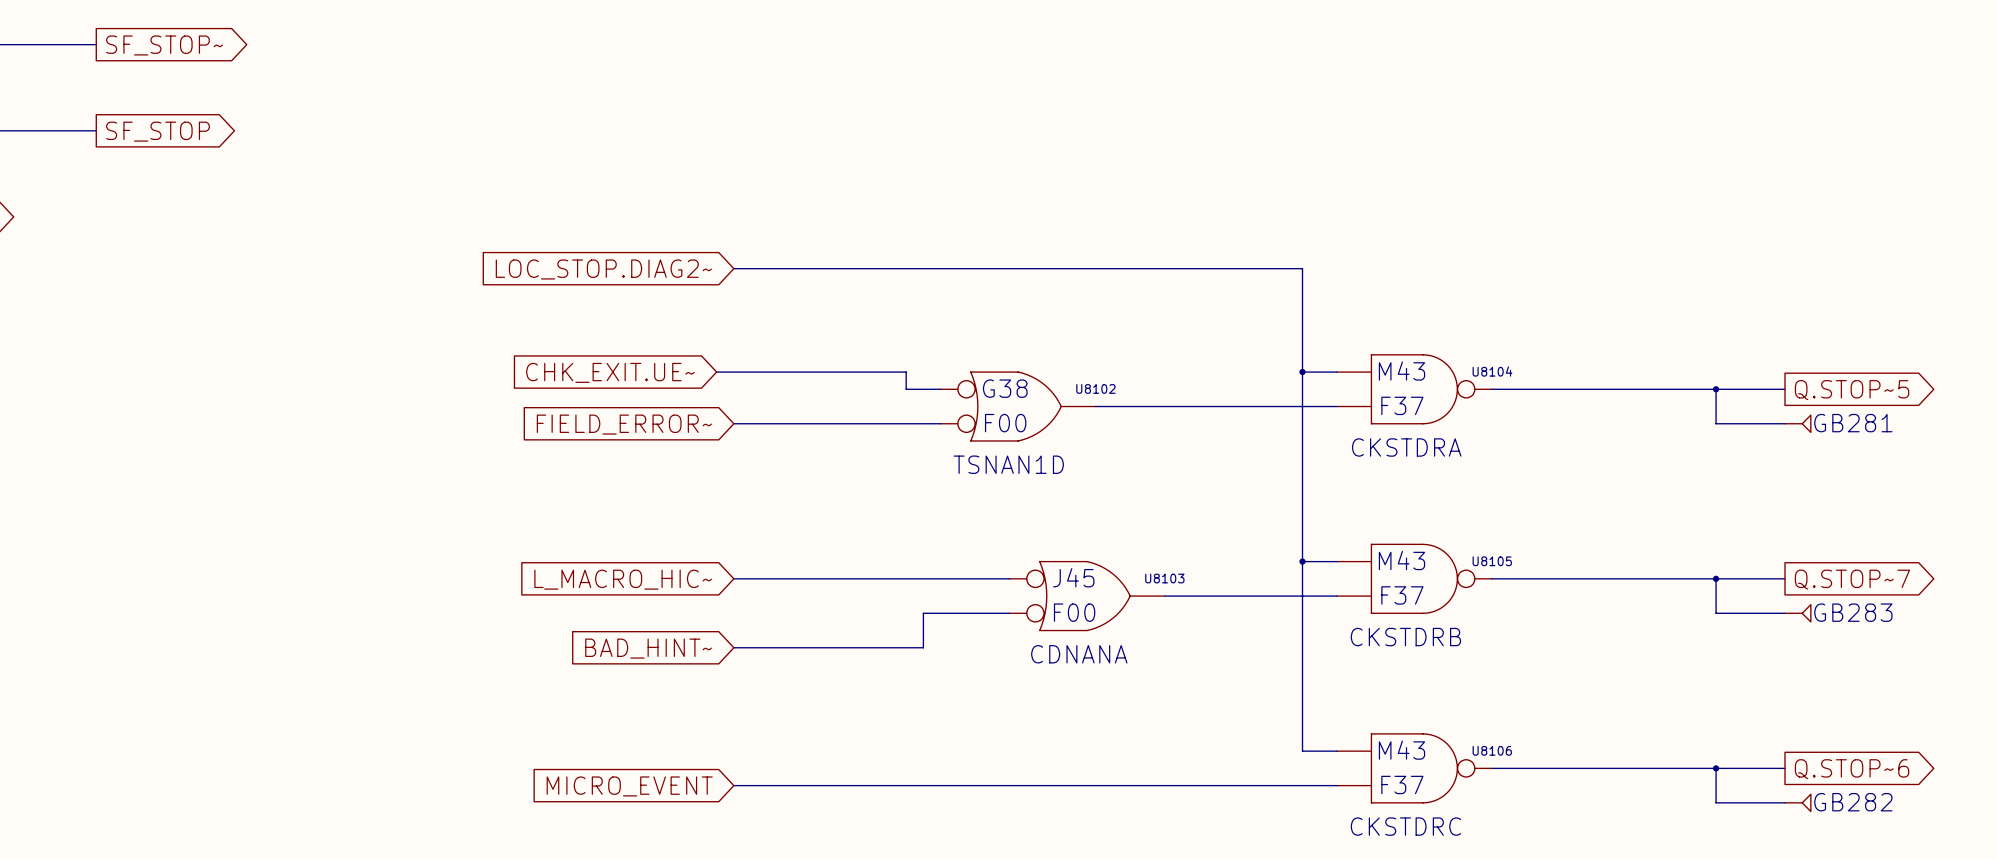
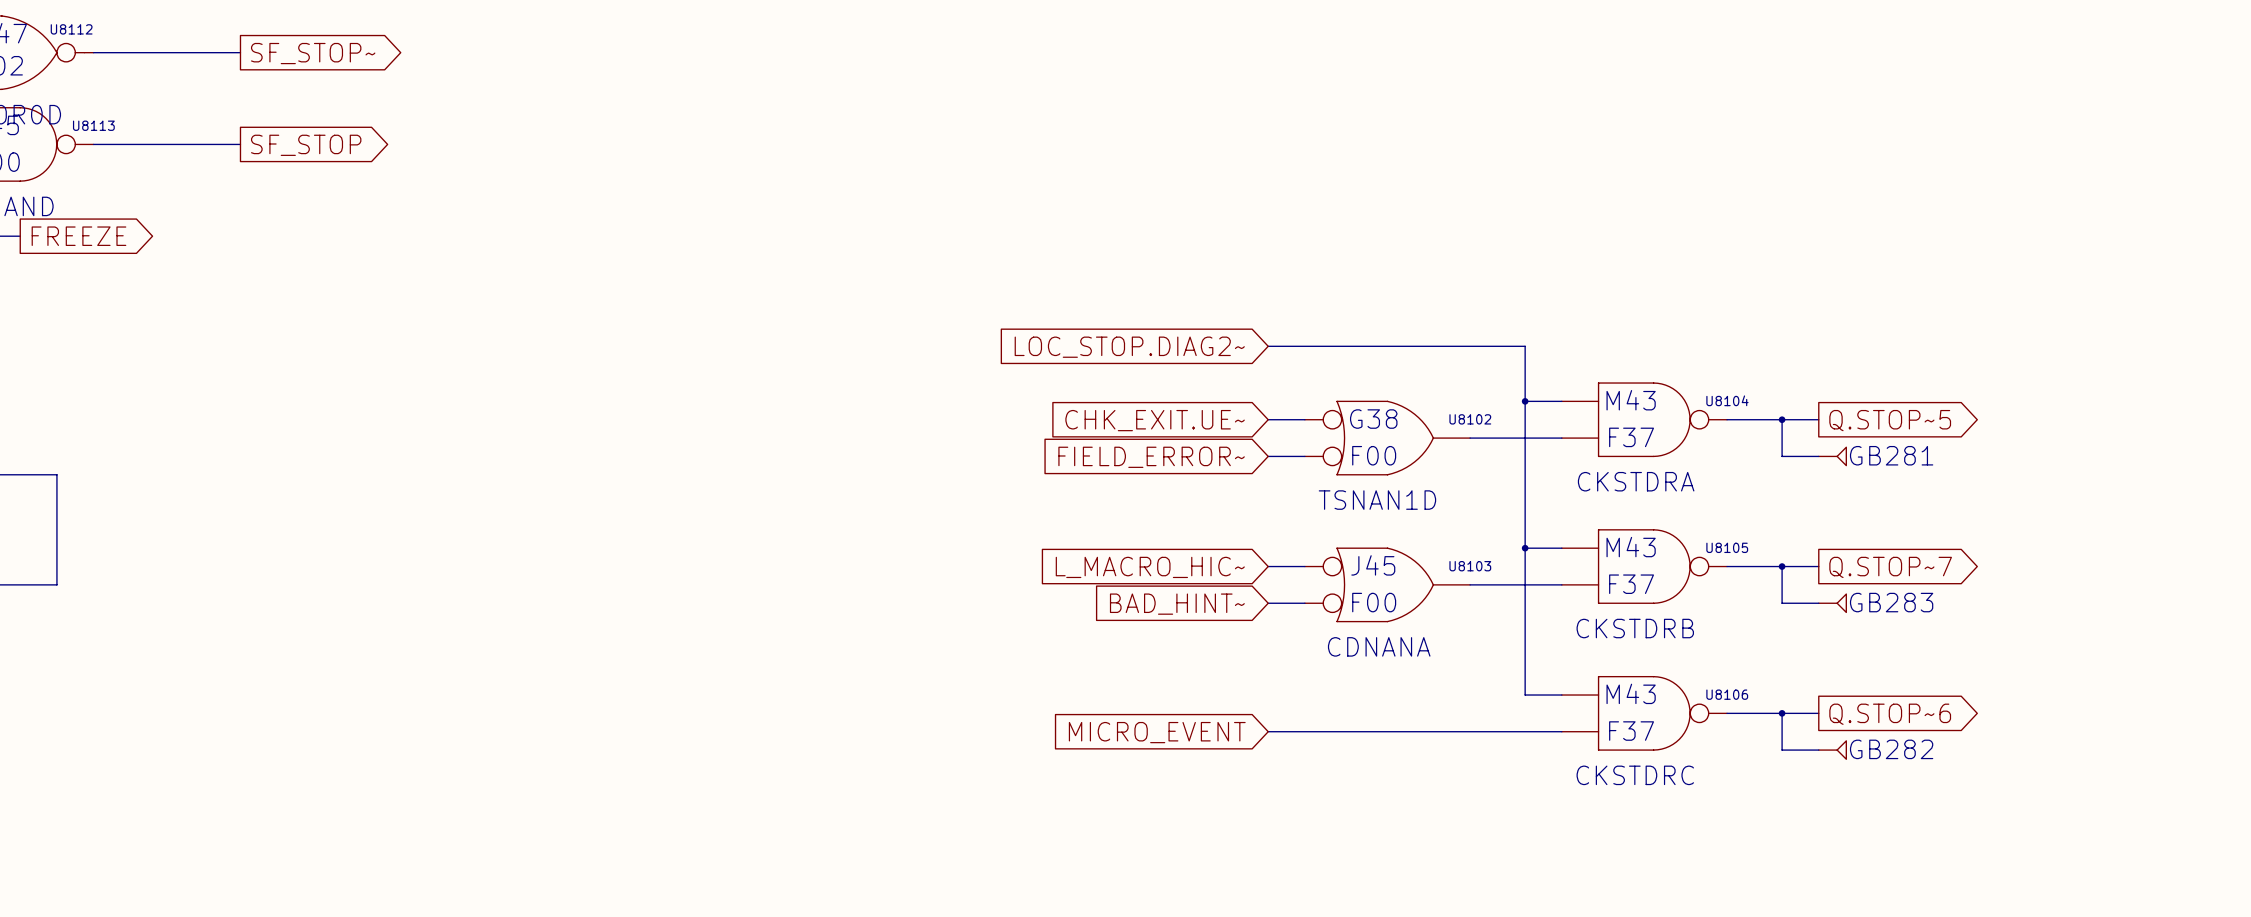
wire: (733, 268) (1302, 268) (1302, 320) -> (1268, 346) (1525, 346)
global label: LOC_STOP.DIAG2~ (603, 269) -> none
global label: none -> LOC_STOP.DIAG2~ (1129, 347)
global label: CHK_EXIT.UE~ (610, 372) -> none
wire: (716, 372) (906, 372) (906, 389) (940, 389) -> none
wire: none -> (1268, 419) (1304, 419)
wire: none -> (1782, 419) (1782, 456) (1818, 456)
junction: none -> (1782, 419)
wire: (1578, 389) (1784, 389) -> none
wire: (1716, 389) (1716, 423) (1784, 423) -> none
junction: (1716, 389) -> none
global label: none -> CHK_EXIT.UE~ (1155, 420)
global label: none -> Q.STOP~5 (1890, 420)
global label: Q.STOP~5 (1852, 390) -> none
U8102 position: (1018, 406) -> (1387, 438)
wire: (1095, 406) (1250, 406) -> none
wire: (733, 423) (940, 423) -> none
wire: none -> (1268, 456) (1304, 456)
GB281 position: (1798, 423) -> (1832, 456)
global label: FIELD_ERROR~ (624, 424) -> none
global label: none -> FIELD_ERROR~ (1151, 457)
junction: none -> (1525, 548)
global label: none -> L_MACRO_HIC~ (1150, 567)
wire: none -> (1268, 566) (1304, 566)
wire: none -> (1727, 566) (1818, 566)
wire: none -> (1782, 566) (1782, 603) (1818, 603)
junction: none -> (1782, 566)
global label: none -> Q.STOP~7 (1890, 567)
wire: none -> (1470, 584) (1561, 584)
wire: (1302, 561) (1336, 561) -> (1525, 548) (1561, 548)
junction: (1302, 561) -> none
global label: none -> BAD_HINT~ (1177, 604)
wire: (733, 578) (1009, 578) -> none
U8105 position: (1414, 578) -> (1644, 566)
wire: (1492, 578) (1784, 578) -> none
wire: (1716, 578) (1716, 613) (1784, 613) -> none
junction: (1716, 578) -> none
global label: L_MACRO_HIC~ (623, 579) -> none
global label: Q.STOP~7 (1852, 579) -> none
U8103 position: (1087, 596) -> (1387, 584)
wire: (1164, 596) (1336, 596) -> none
wire: (1009, 613) (923, 613) (923, 647) (733, 647) -> none
GB283 position: (1798, 613) -> (1832, 603)
wire: (1302, 647) (1302, 751) (1336, 751) -> (1525, 695) (1561, 695)
global label: BAD_HINT~ (648, 648) -> none
wire: none -> (1727, 713) (1818, 713)
wire: none -> (1782, 713) (1782, 750) (1818, 750)
junction: none -> (1782, 713)
global label: none -> Q.STOP~6 (1890, 714)
wire: none -> (1268, 731) (1561, 731)
global label: none -> MICRO_EVENT (1157, 732)
U8106 position: (1414, 768) -> (1644, 713)
wire: (1492, 768) (1784, 768) -> none
wire: (1716, 768) (1716, 802) (1784, 802) -> none
junction: (1716, 768) -> none
global label: Q.STOP~6 (1852, 769) -> none
wire: (733, 785) (1336, 785) -> none
global label: MICRO_EVENT (629, 786) -> none
GB282 position: (1798, 802) -> (1832, 750)

